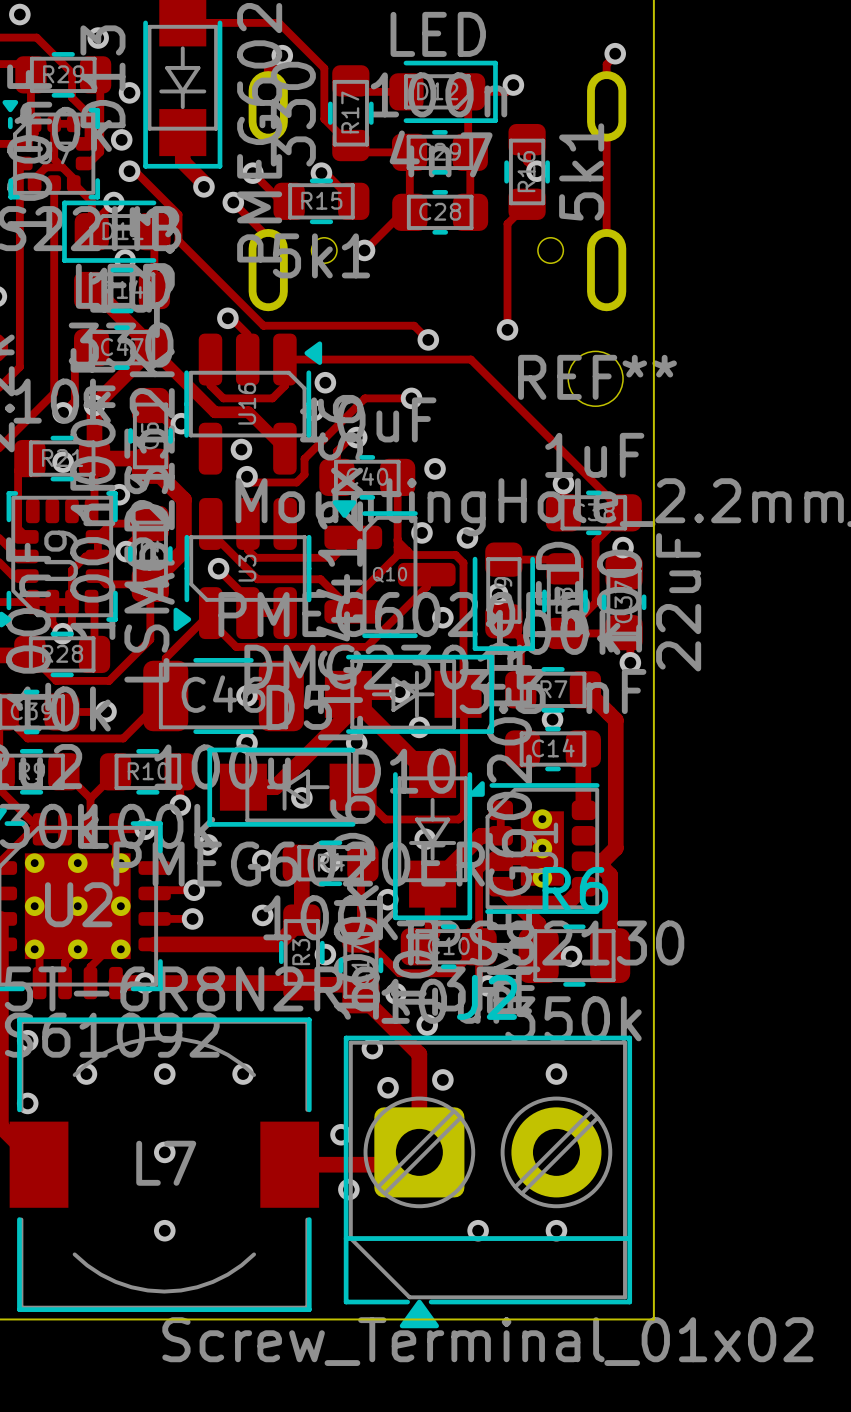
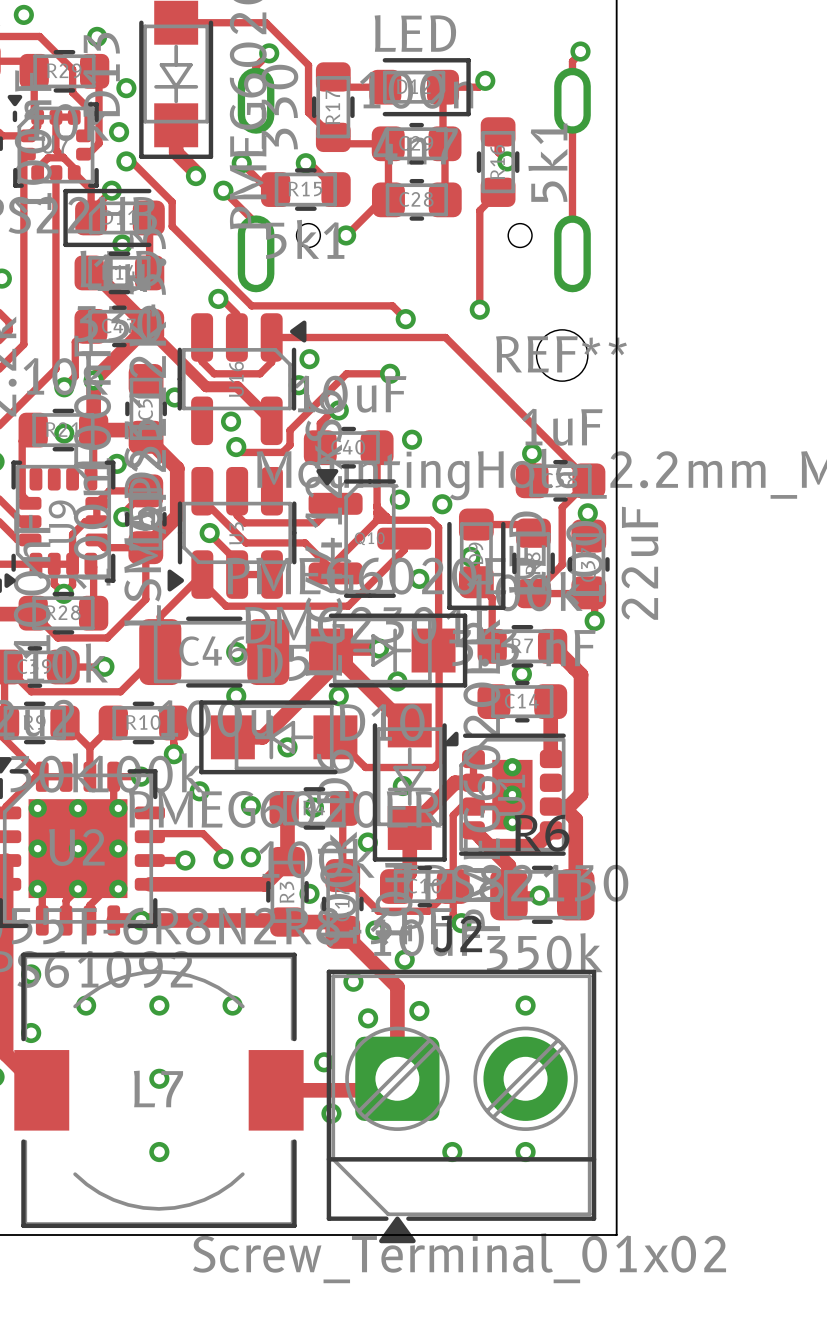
track: none -> (186, 833) (203, 833) (223, 854) (223, 859)
via position: (194, 890) -> (223, 859)

